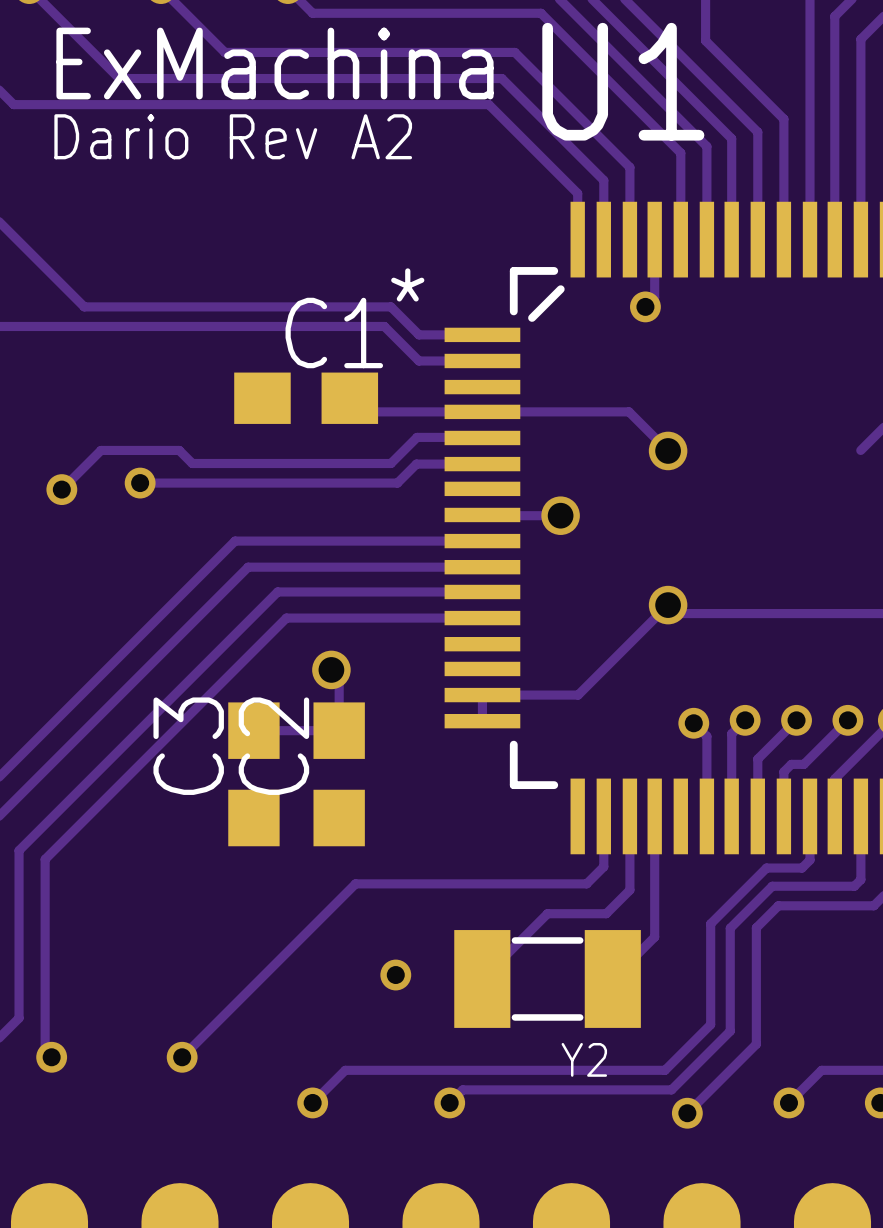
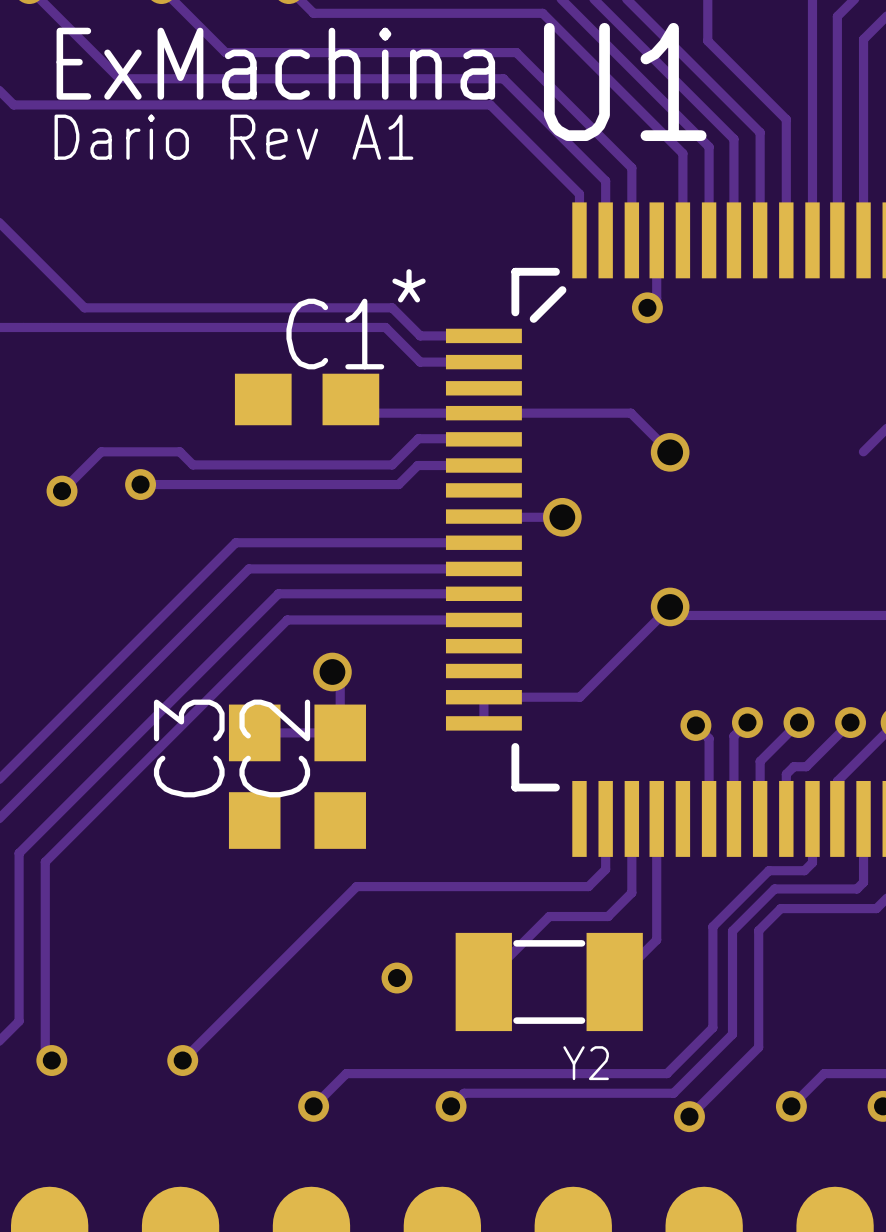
text: Dario Rev A2 (233, 136) -> Dario Rev A1 (233, 137)

